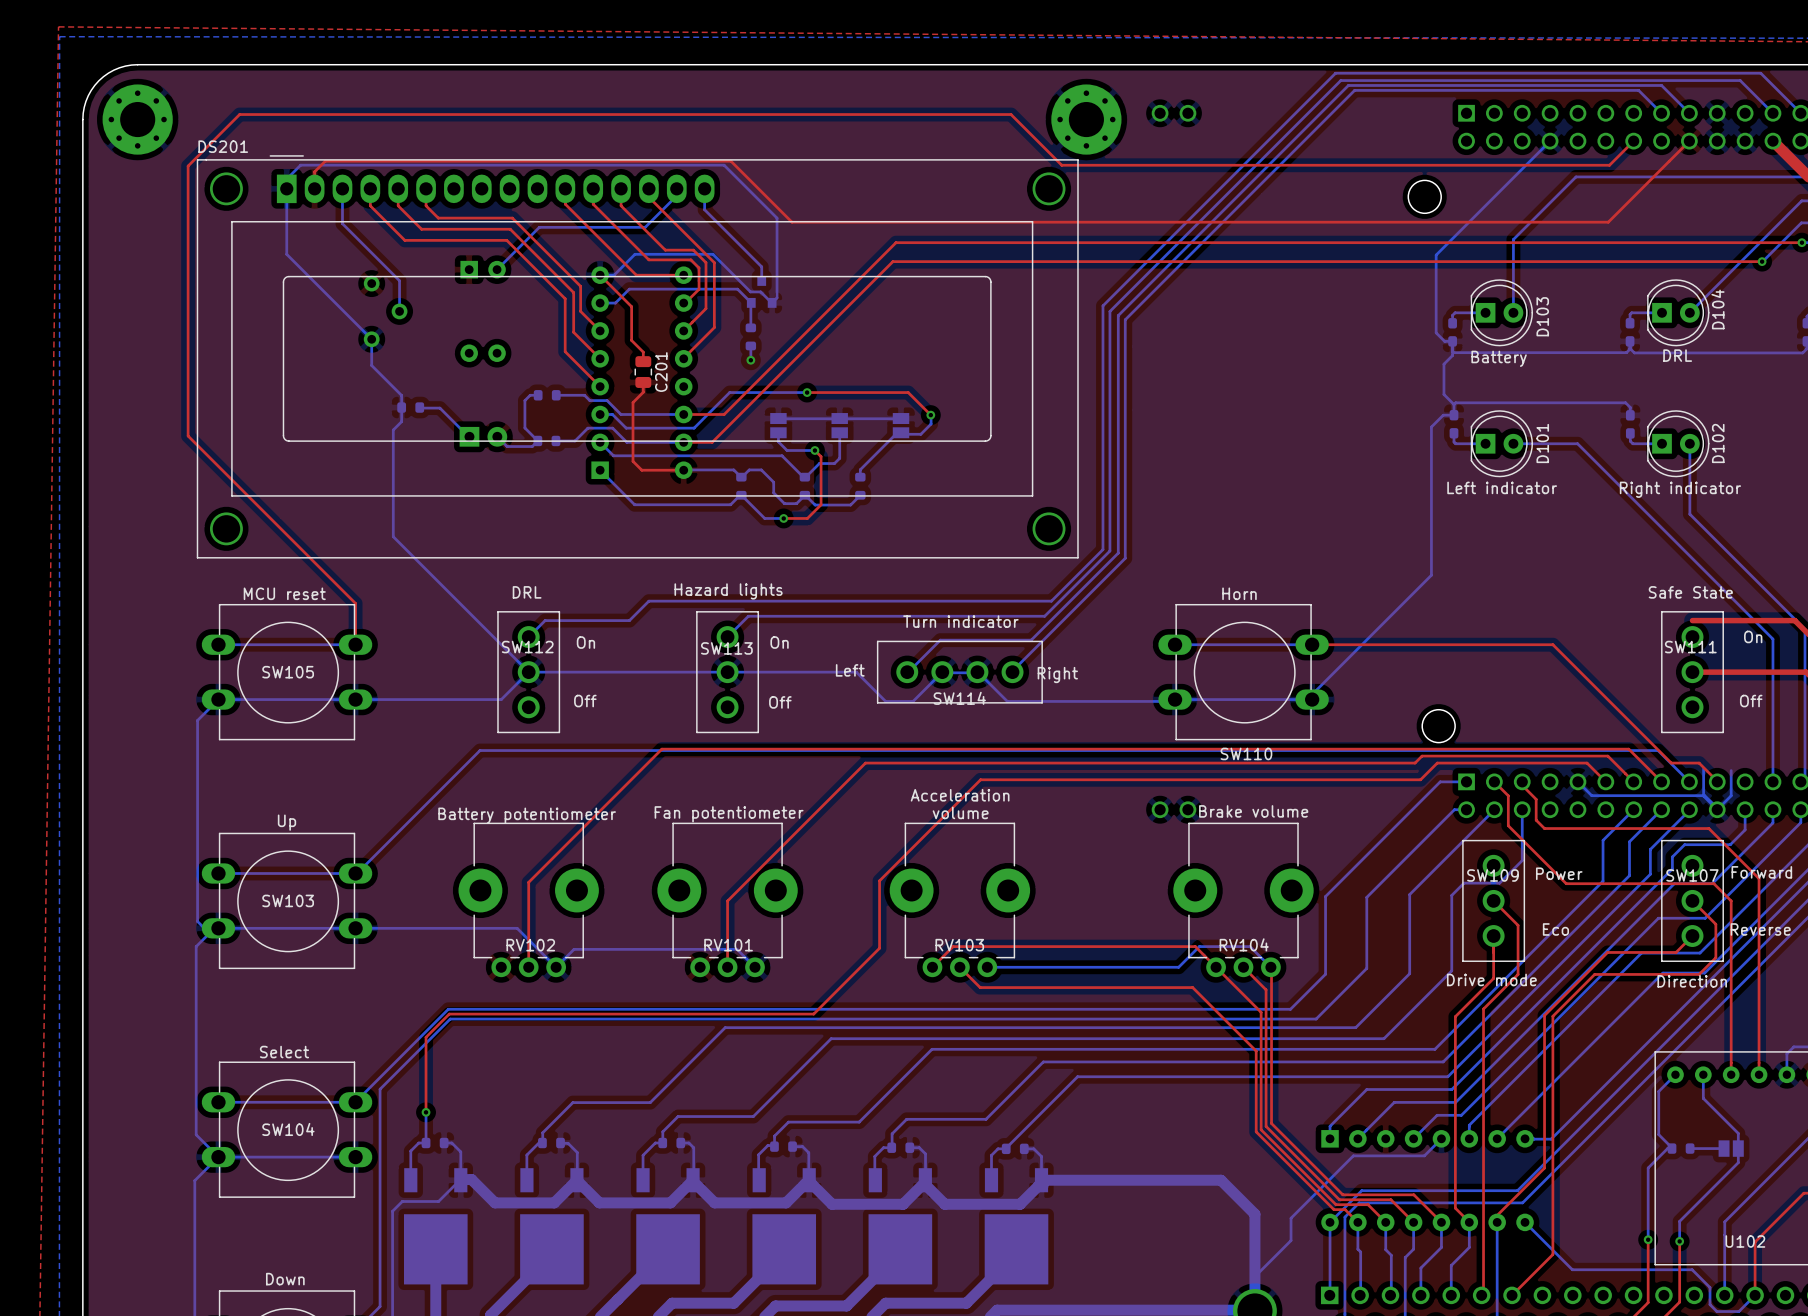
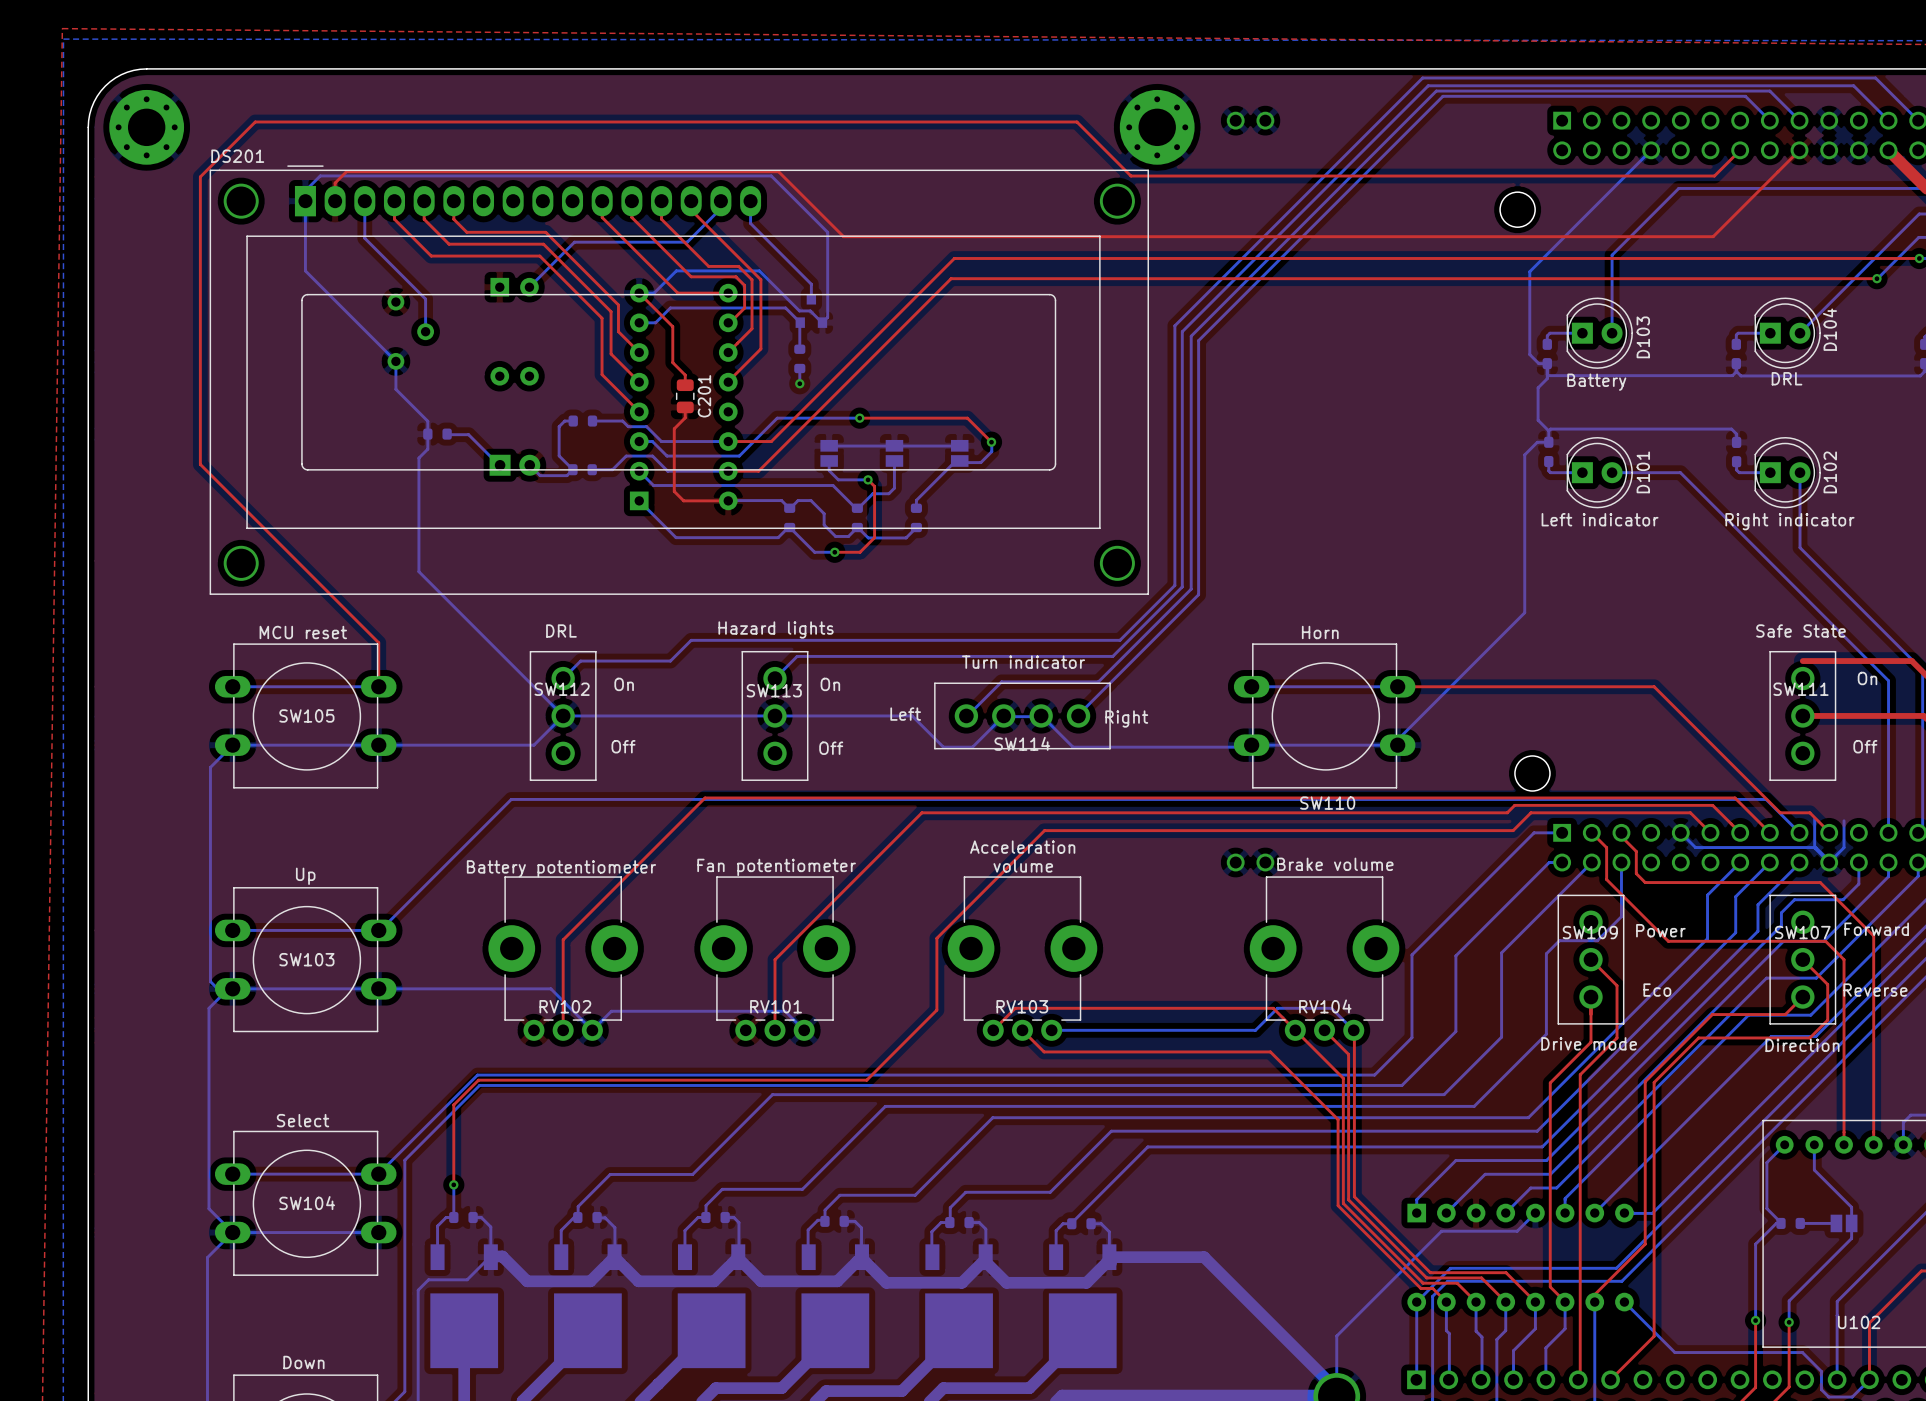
bottom track: (1130, 1180) (1221, 1180) (1254, 1214) (1254, 1254) -> (1204, 1257) (1336, 1389)
bottom track: (1291, 1218) (1291, 1240) (1254, 1276) (1254, 1304) -> (1375, 1297) (1336, 1336)
bottom track width: thick (1254, 1254) (1254, 1276) -> thin (1336, 1336) (1336, 1359)

